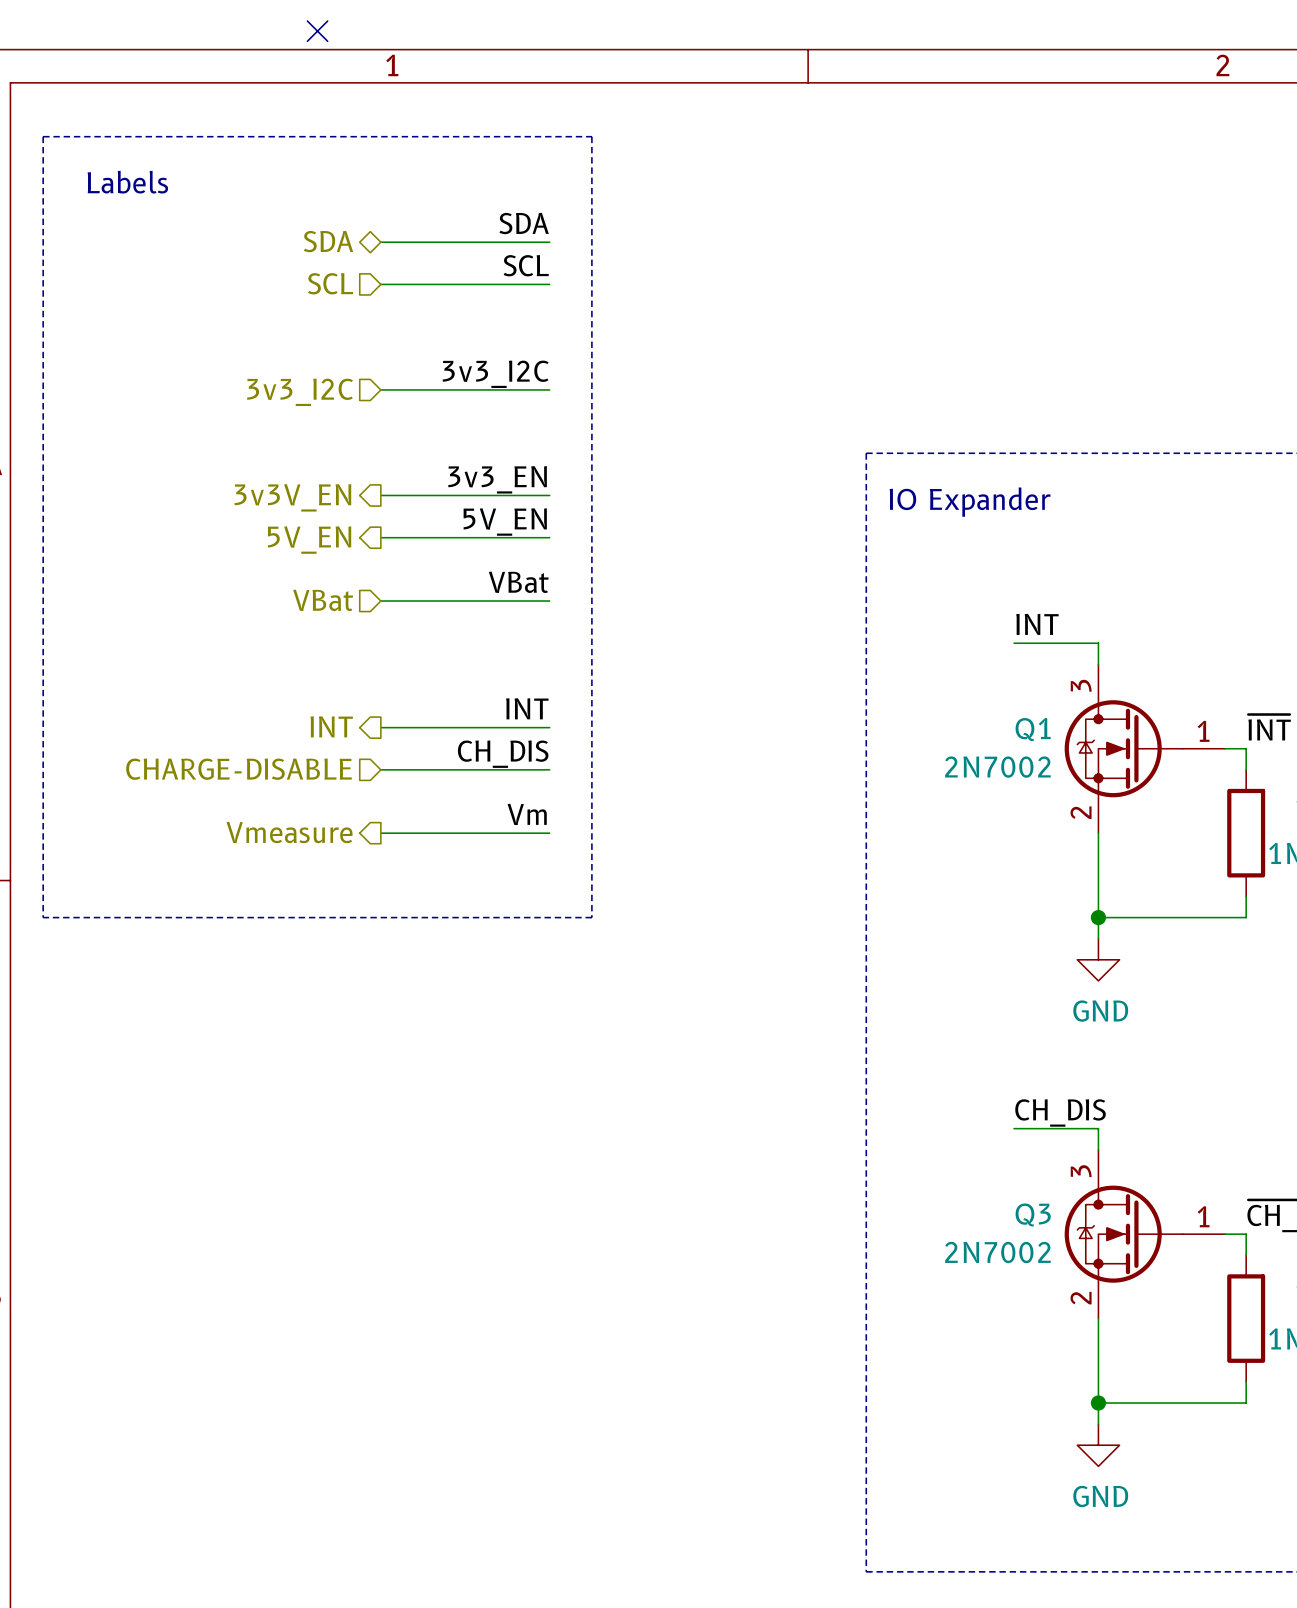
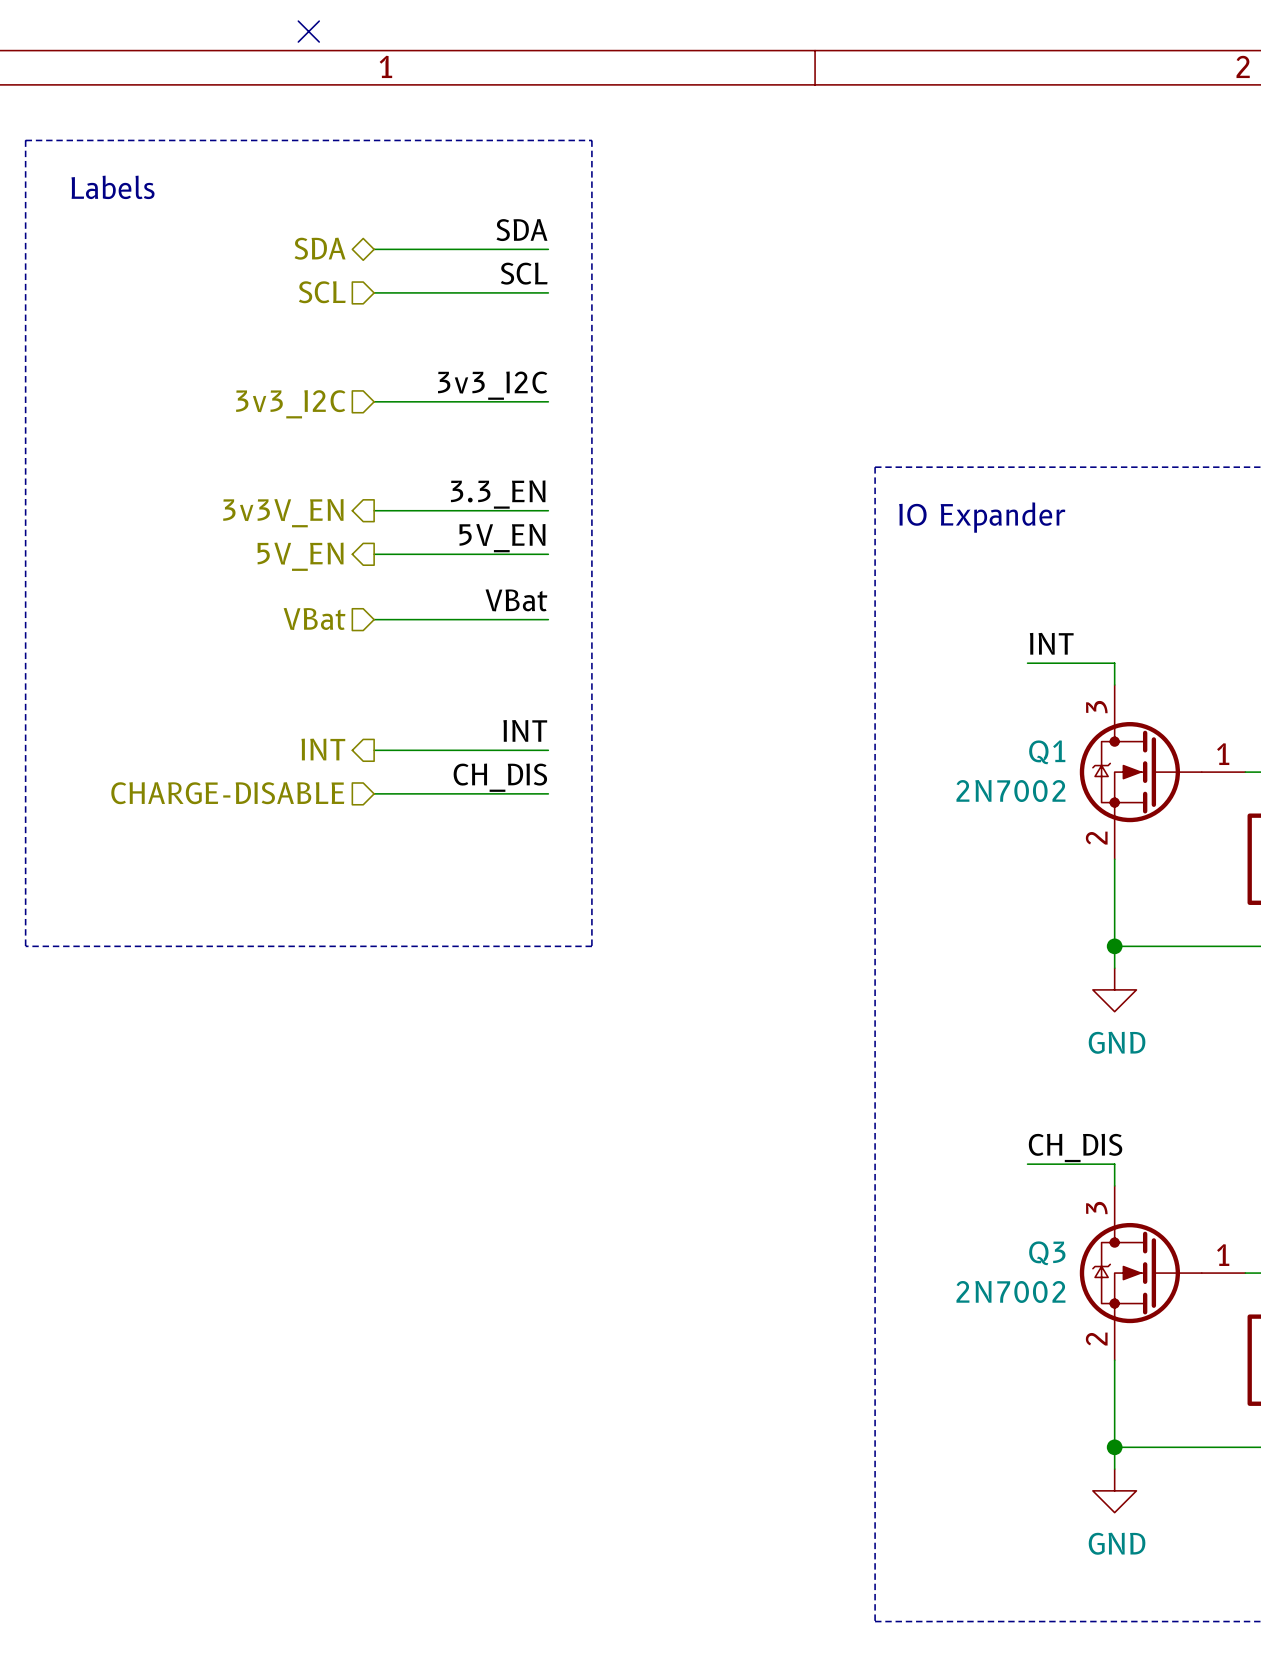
label: 3v3_EN (497, 479) -> 3.3_EN (498, 494)
label: Vm (527, 814) -> none
hierarchical label: Vmeasure (289, 832) -> none
wire: (380, 833) (549, 833) -> none

